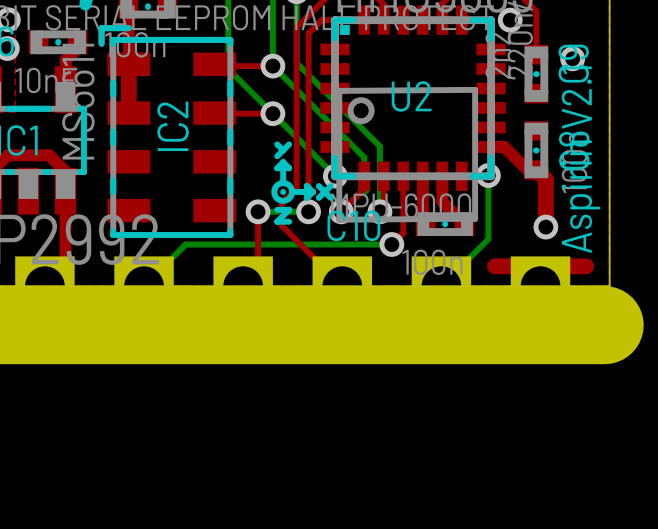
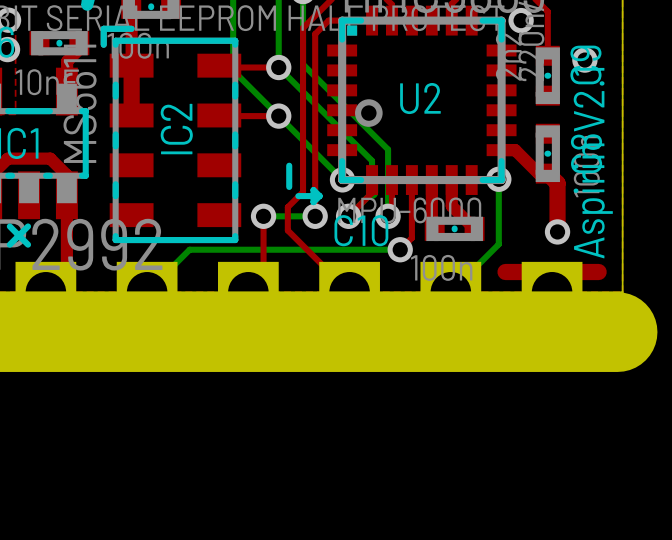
line: (475, 89) (339, 90) (339, 219) (475, 218) (475, 89) -> none
line: (277, 144) (283, 150) -> none
line: (289, 144) (277, 156) -> none
line: (283, 162) (289, 168) (277, 168) (283, 162) -> none
drawing: [271, 180, 296, 204] -> none
line: (318, 186) (330, 197) -> none
line: (330, 186) (318, 197) -> none
line: (277, 209) (289, 209) (277, 221) (289, 221) -> none
line: none -> (9, 226) (28, 244)
line: none -> (28, 226) (9, 244)

